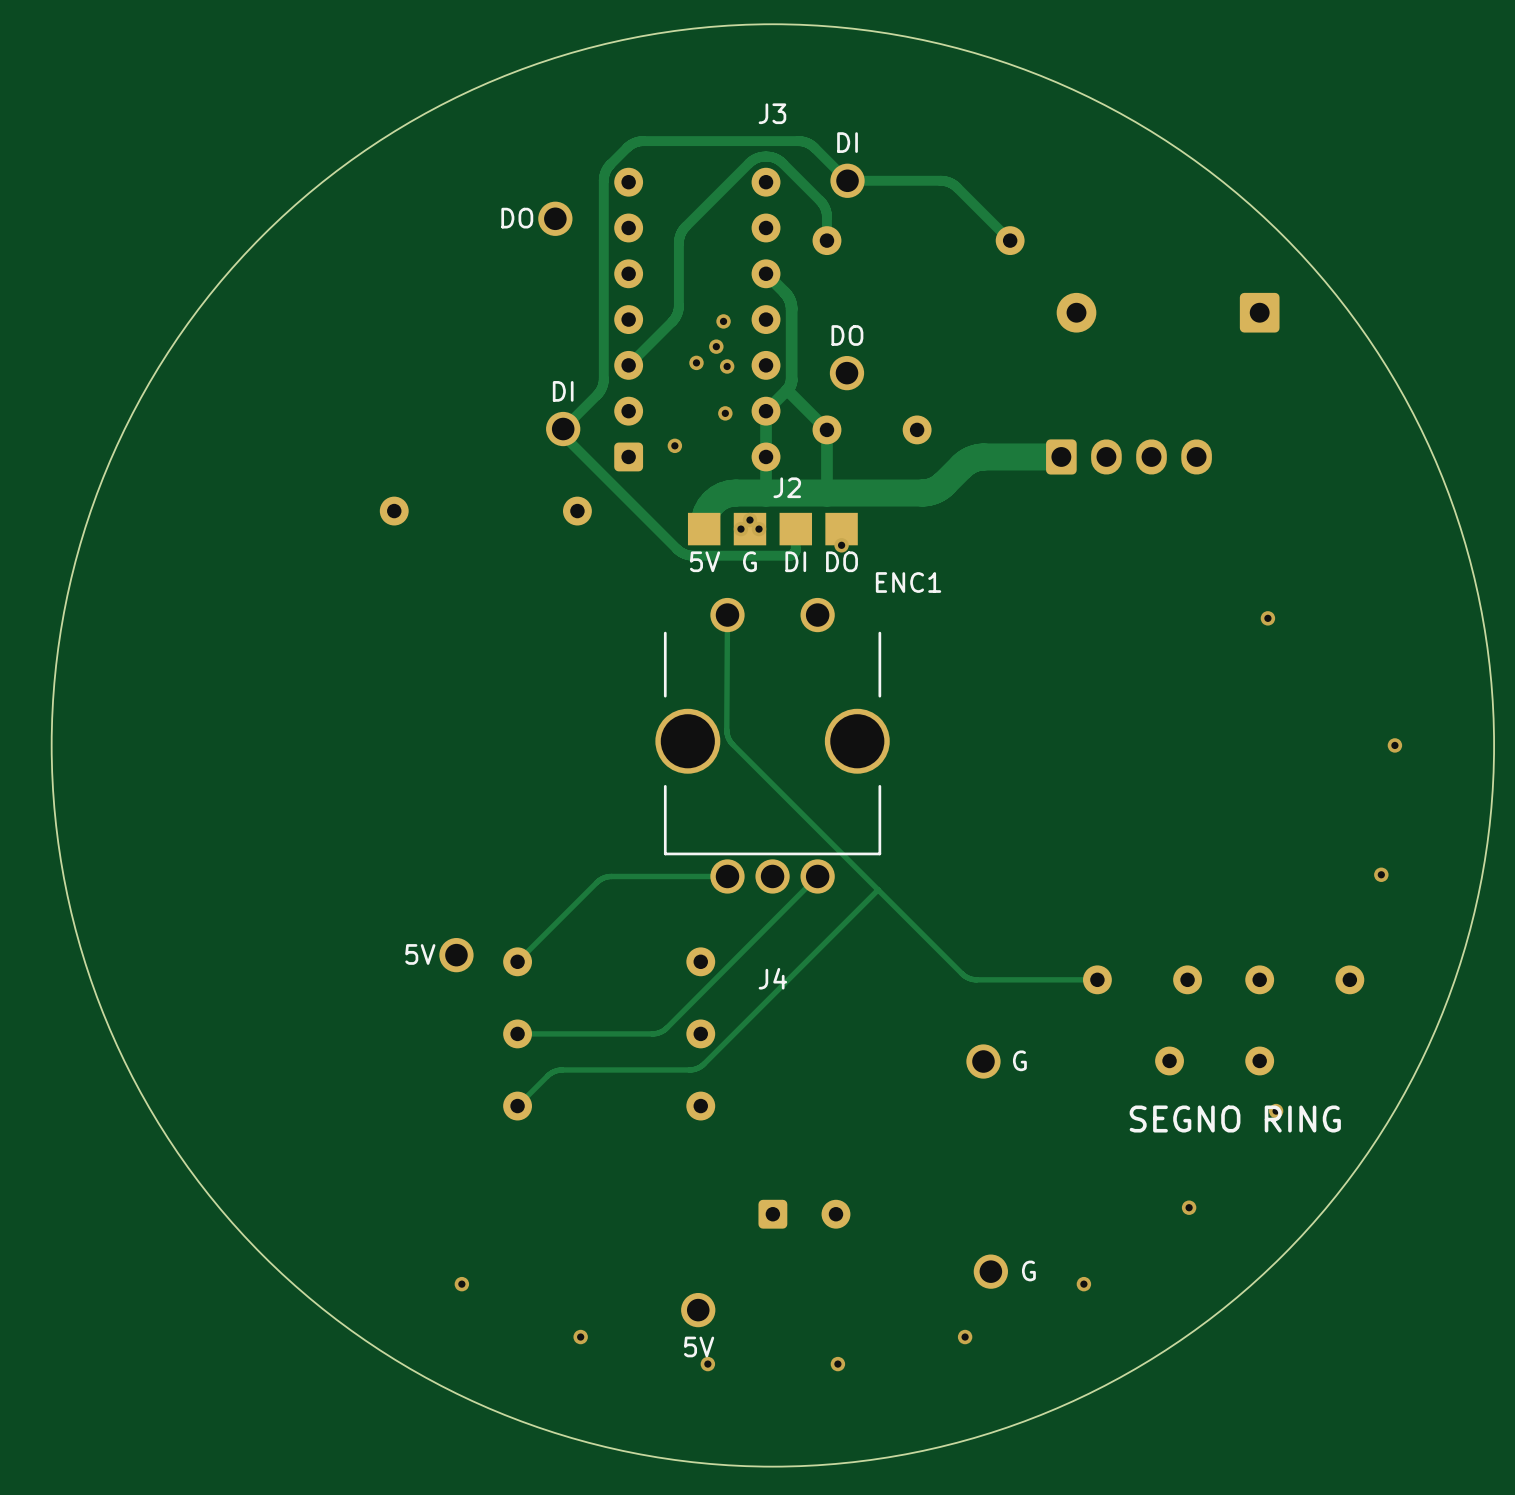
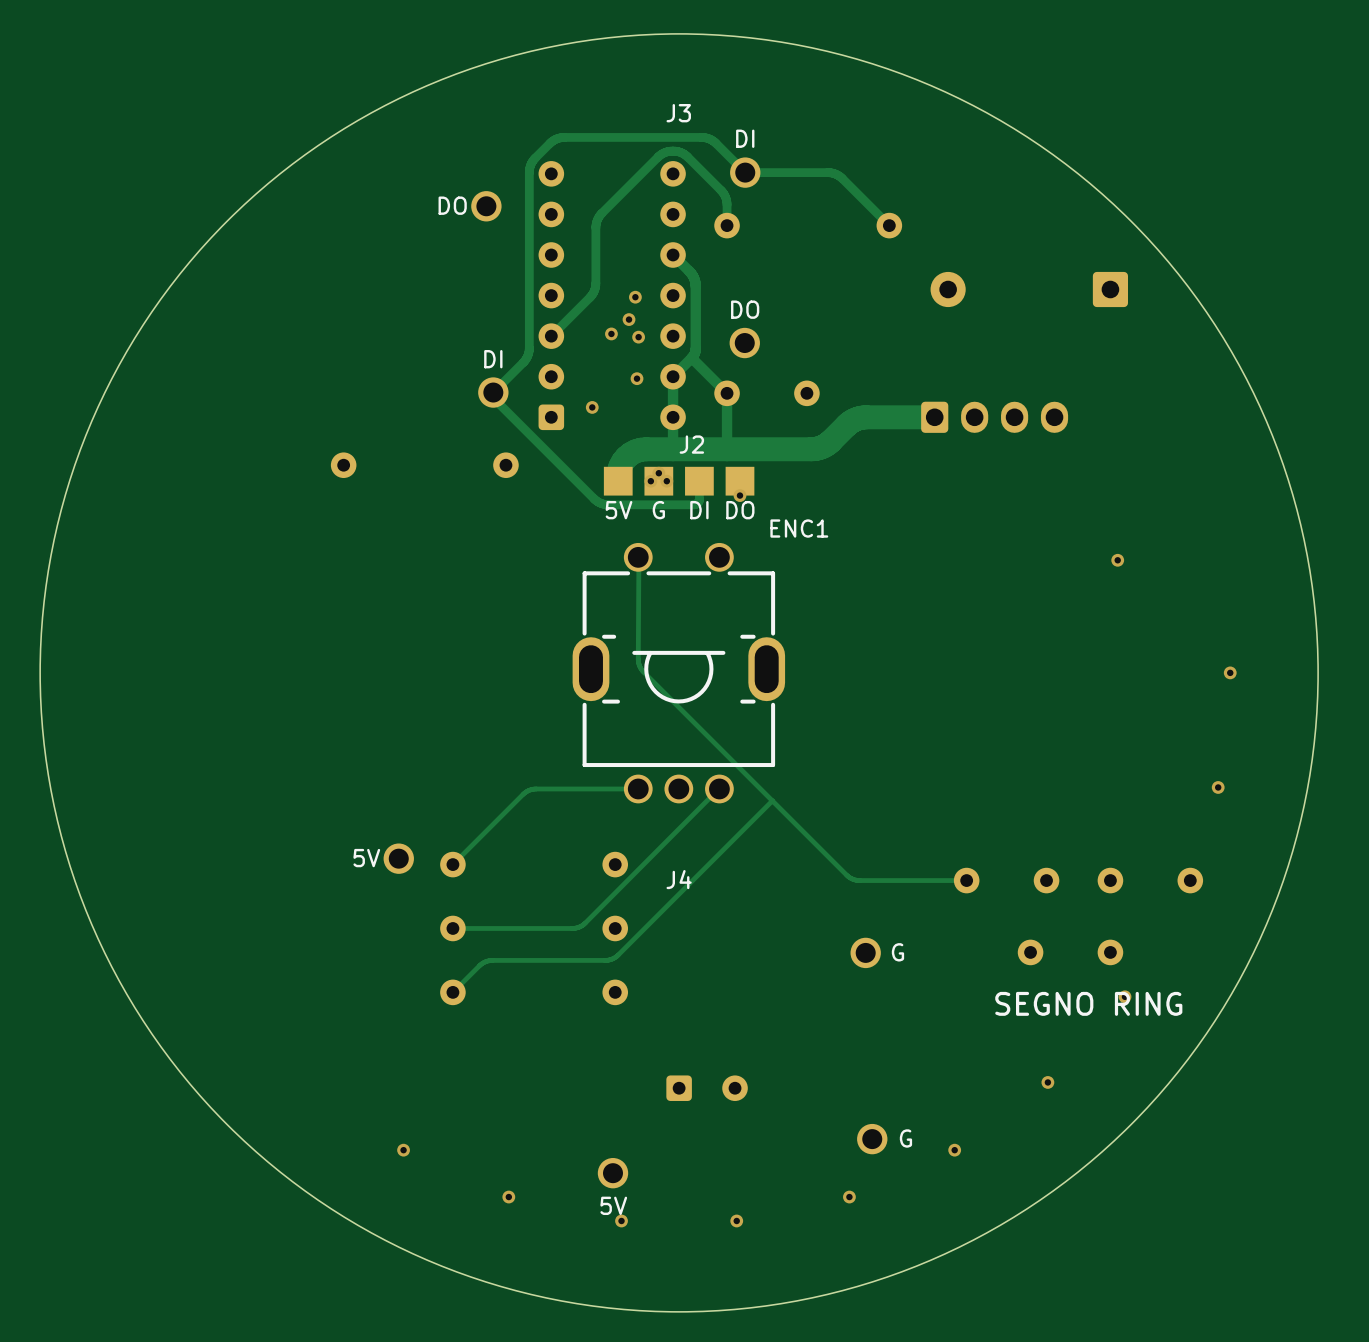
ENC1 footprint: [655, 597, 890, 894] -> [572, 542, 786, 804]

